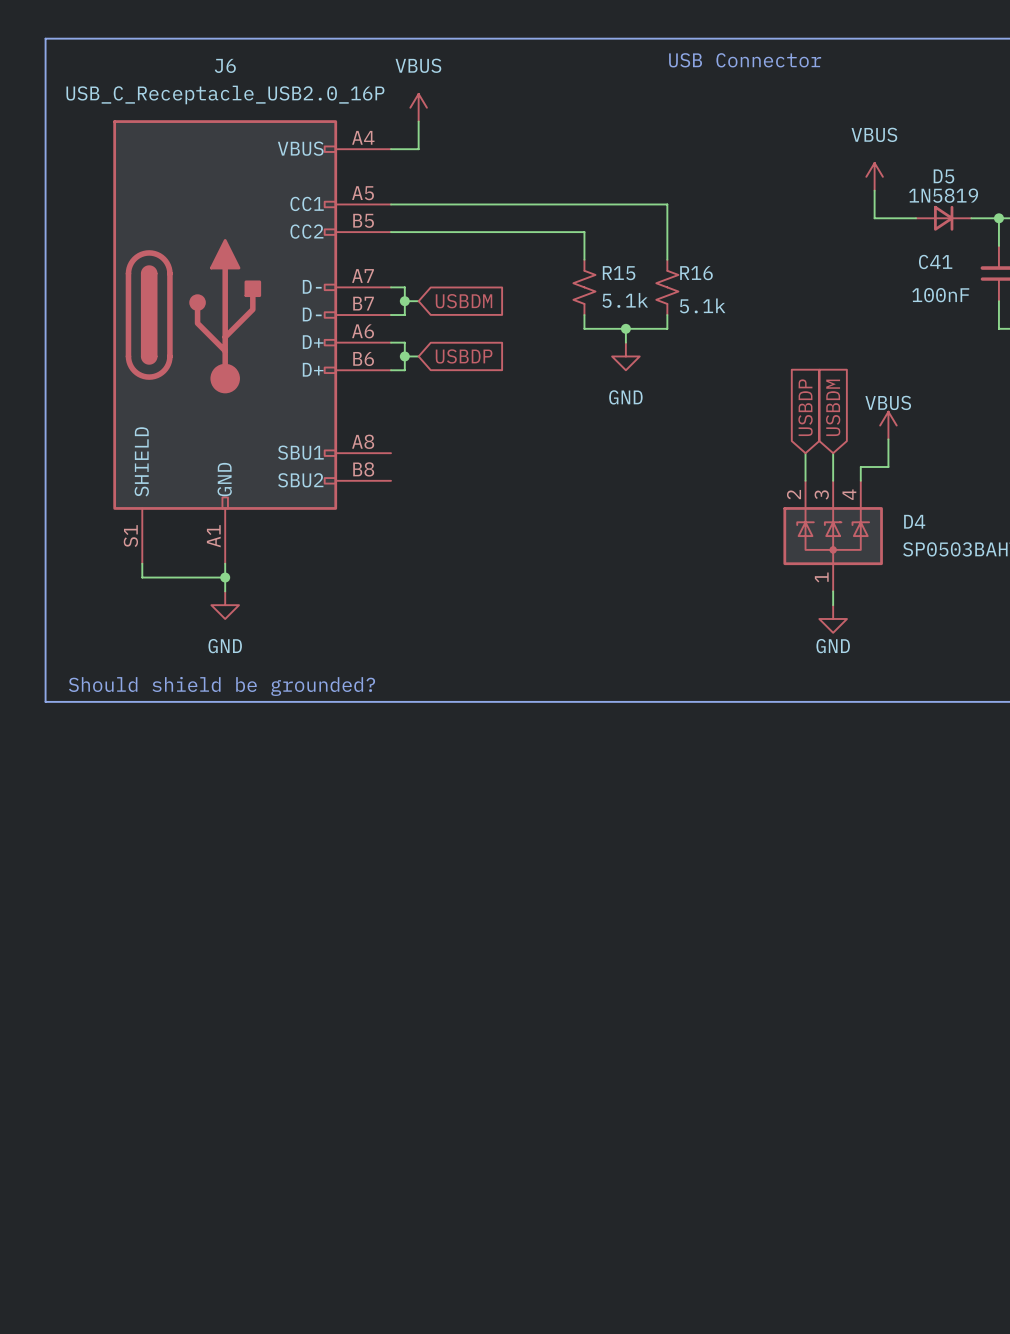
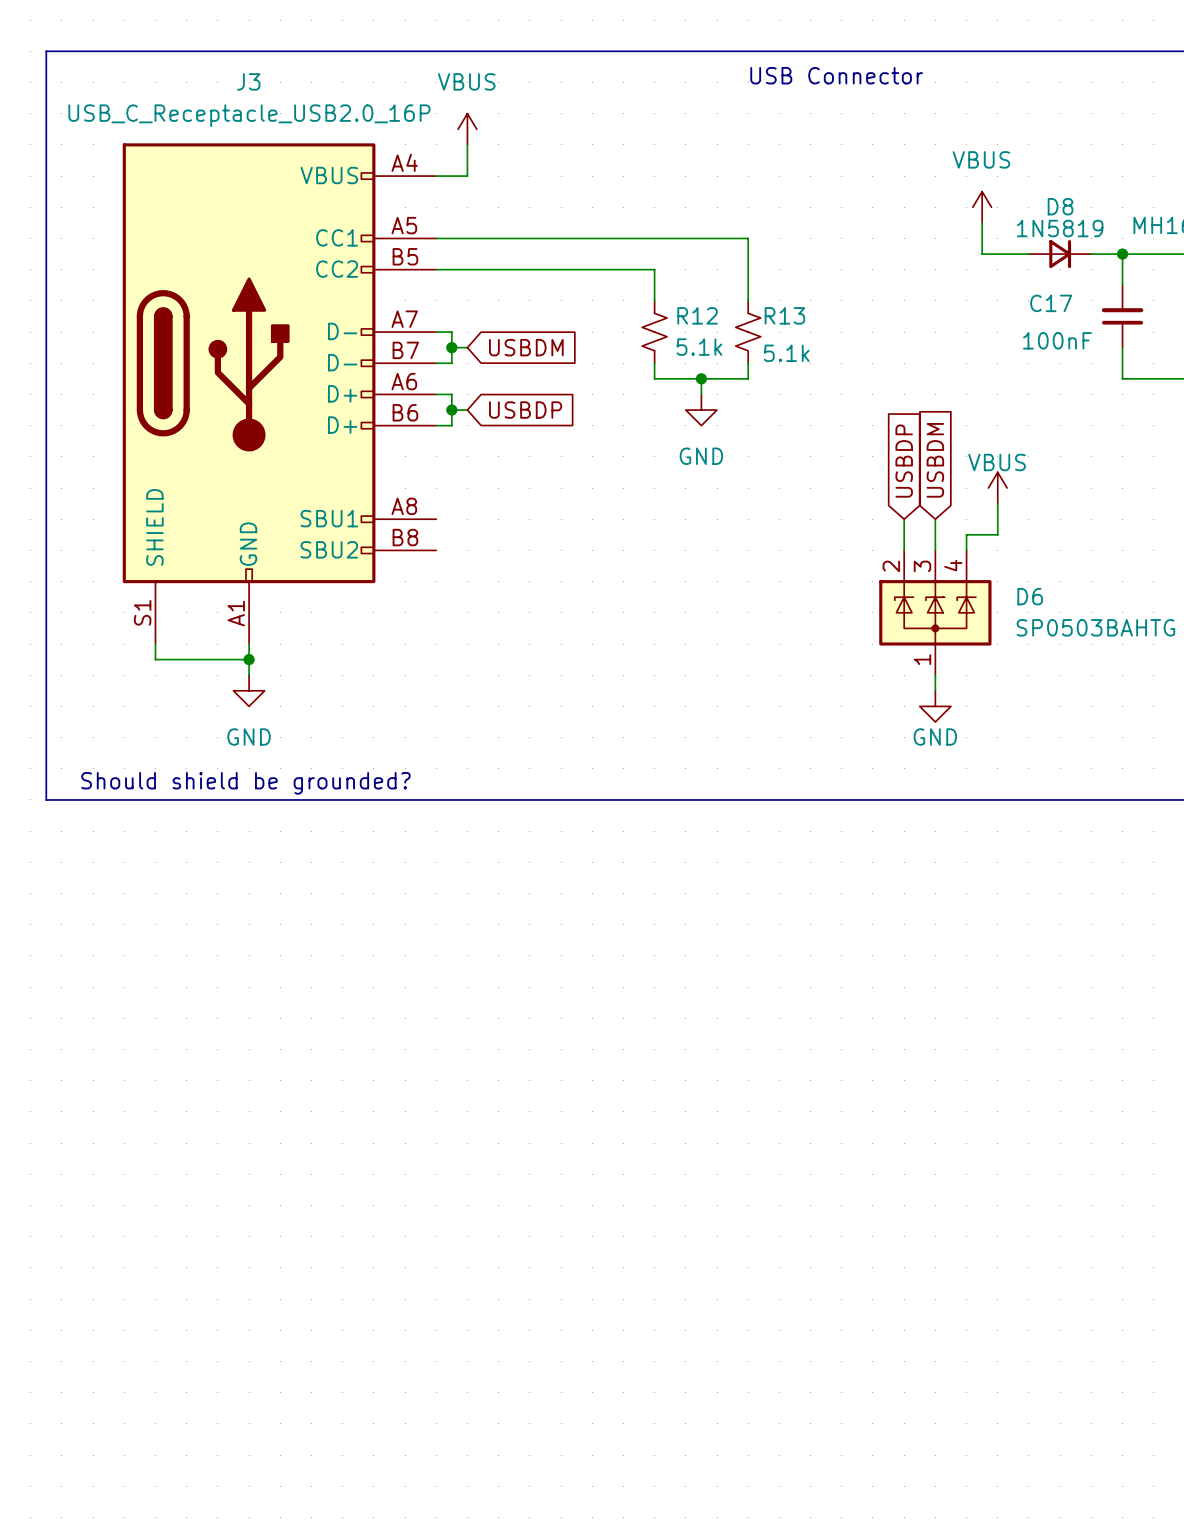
J6 name: J6 (225, 65) -> J3 (248, 81)
D5 name: D5 (943, 176) -> D8 (1060, 206)
C41 name: C41 (935, 261) -> C17 (1051, 303)
R15 name: R15 (619, 273) -> R12 (697, 315)
R16 name: R16 (696, 273) -> R13 (784, 315)
D4 name: D4 (914, 521) -> D6 (1030, 596)

